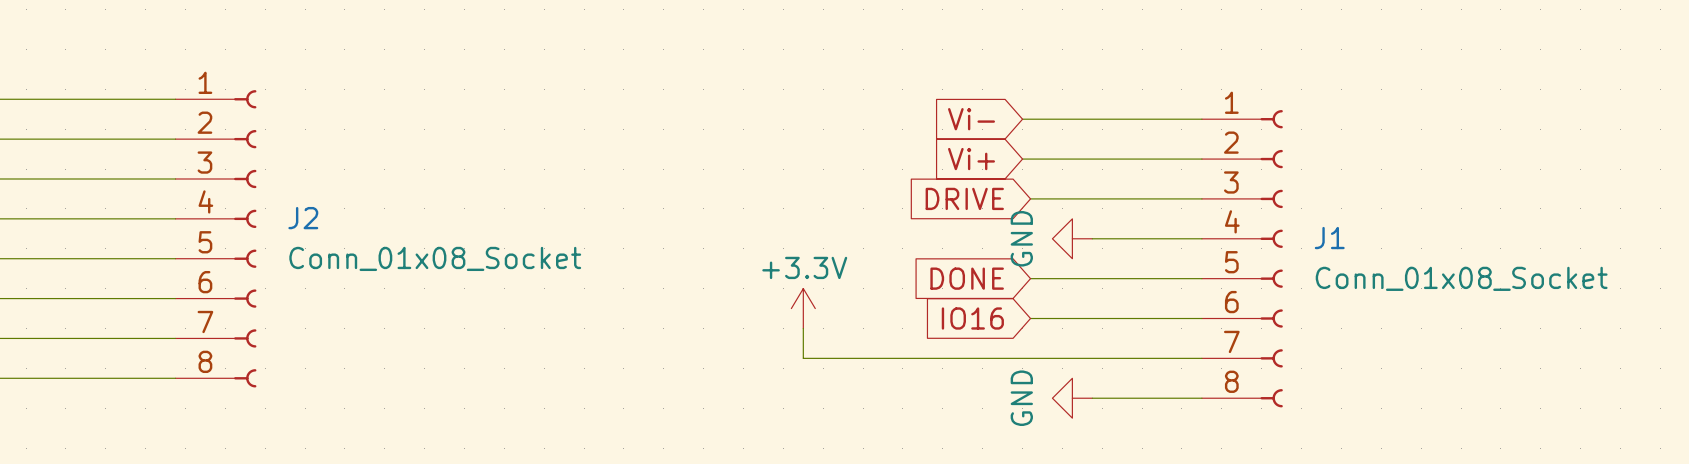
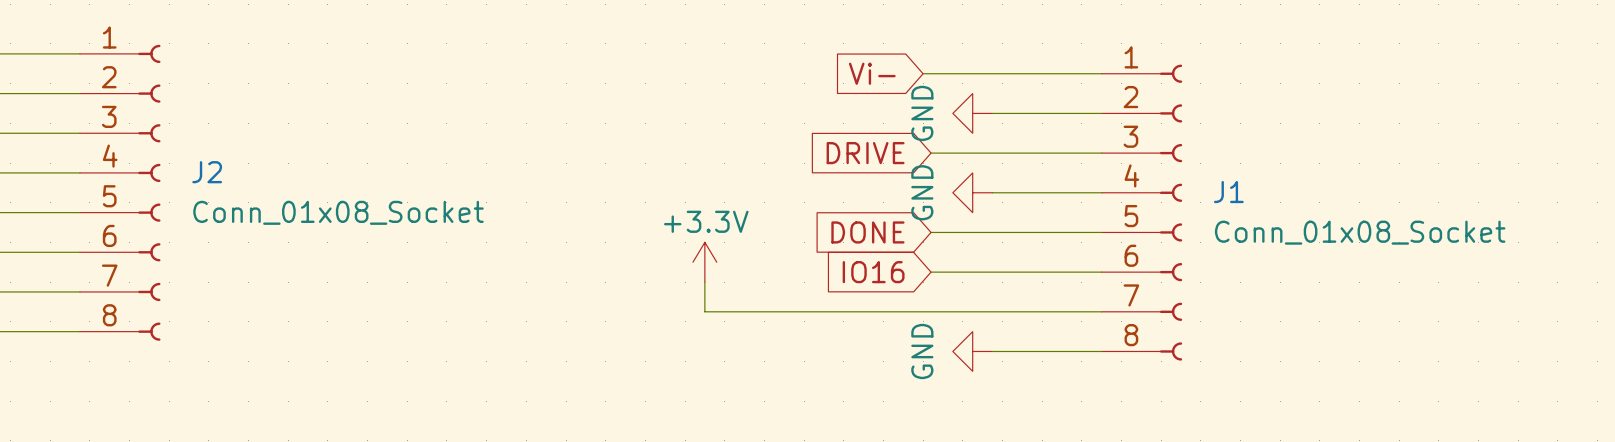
global label: Vi+ (971, 159) -> none
wire: (1022, 159) (1092, 159) -> none
power symbol: none -> GND (972, 113)

